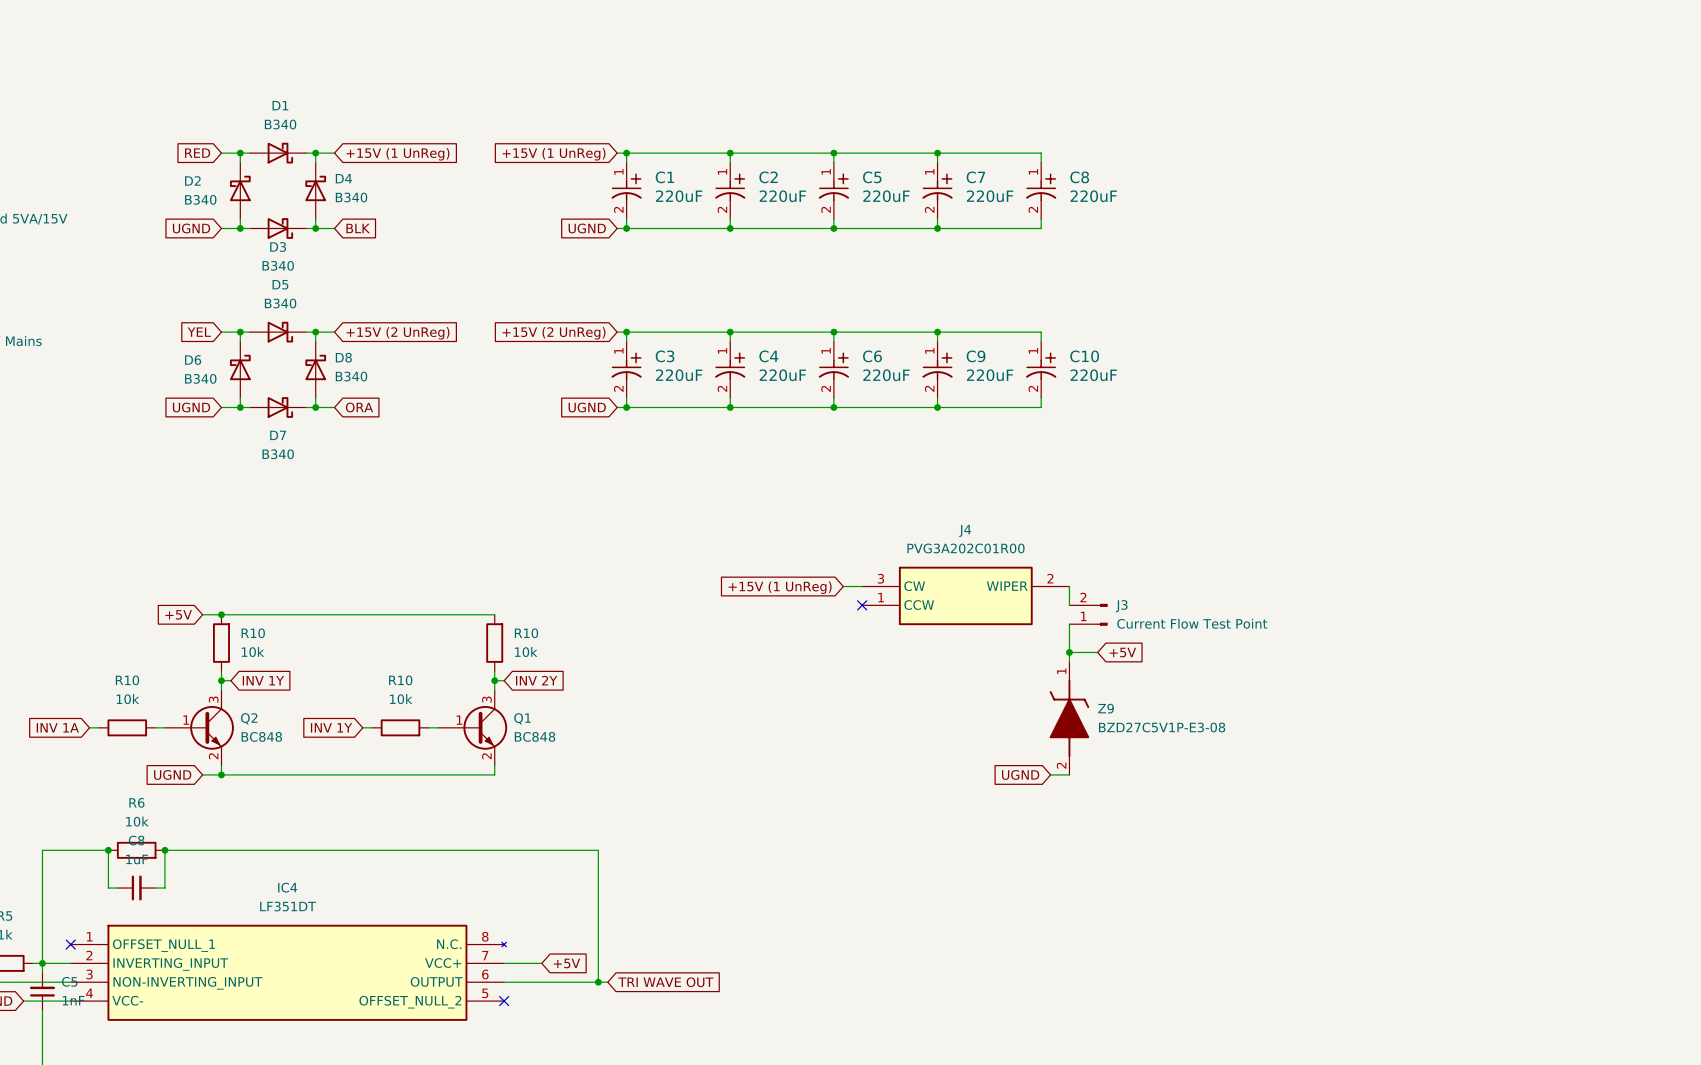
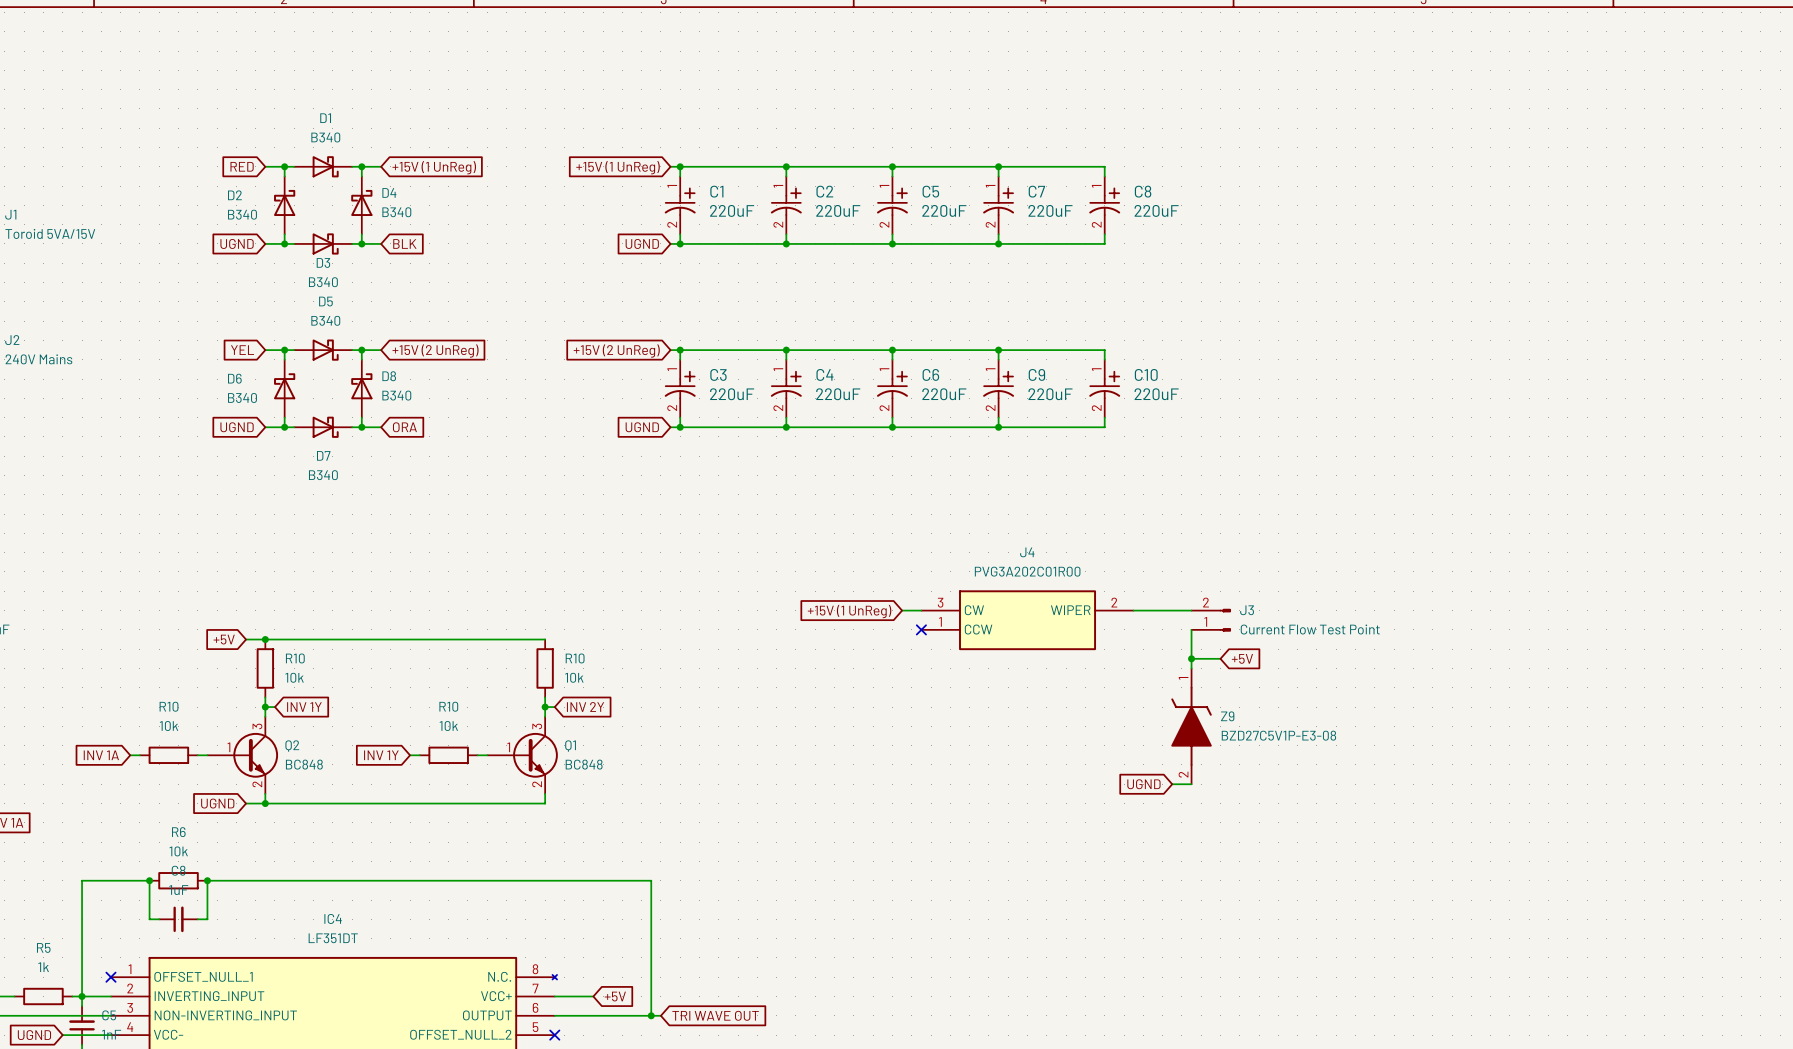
wire: (1069, 586) (1069, 605) -> (1133, 610) (1191, 610)
J3 position: (1088, 614) -> (1211, 620)
wire: (1069, 624) (1069, 661) -> (1191, 629) (1191, 668)
junction: none -> (1191, 658)
wire: (1069, 652) (1097, 652) -> (1191, 658) (1220, 658)
junction: (1069, 652) -> none
global label position: +5V (1122, 652) -> +5V (1242, 658)
Z9 position: (1069, 718) -> (1191, 726)
global label position: UGND (1020, 774) -> UGND (1143, 784)
wire: (1050, 774) (1069, 774) -> (1172, 784) (1191, 784)

